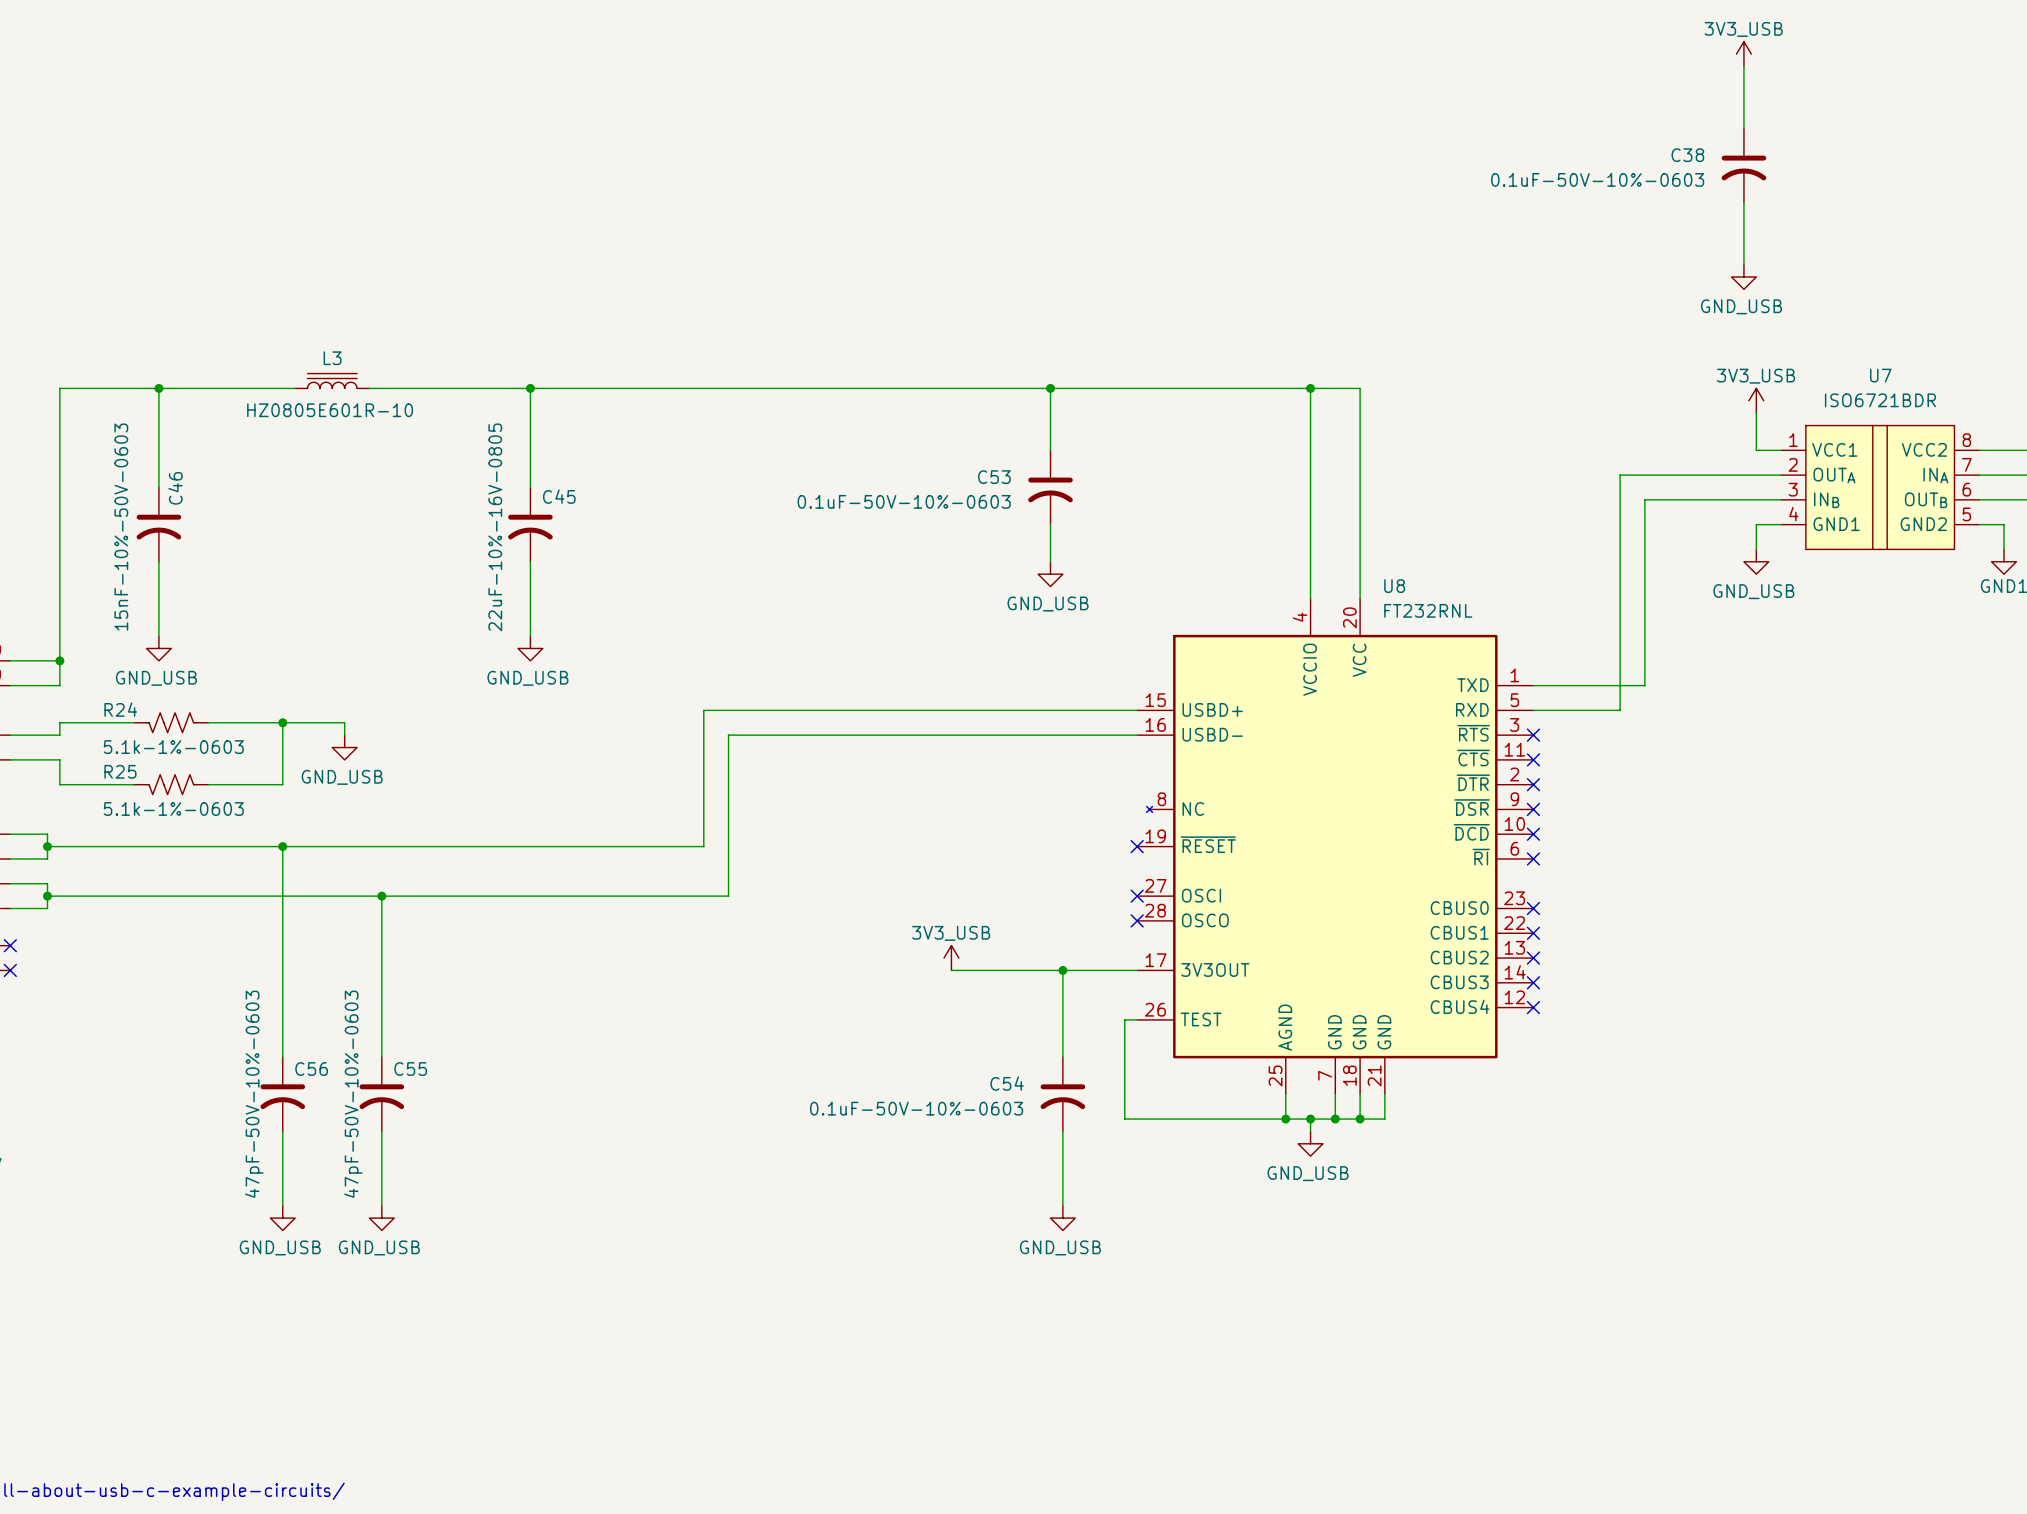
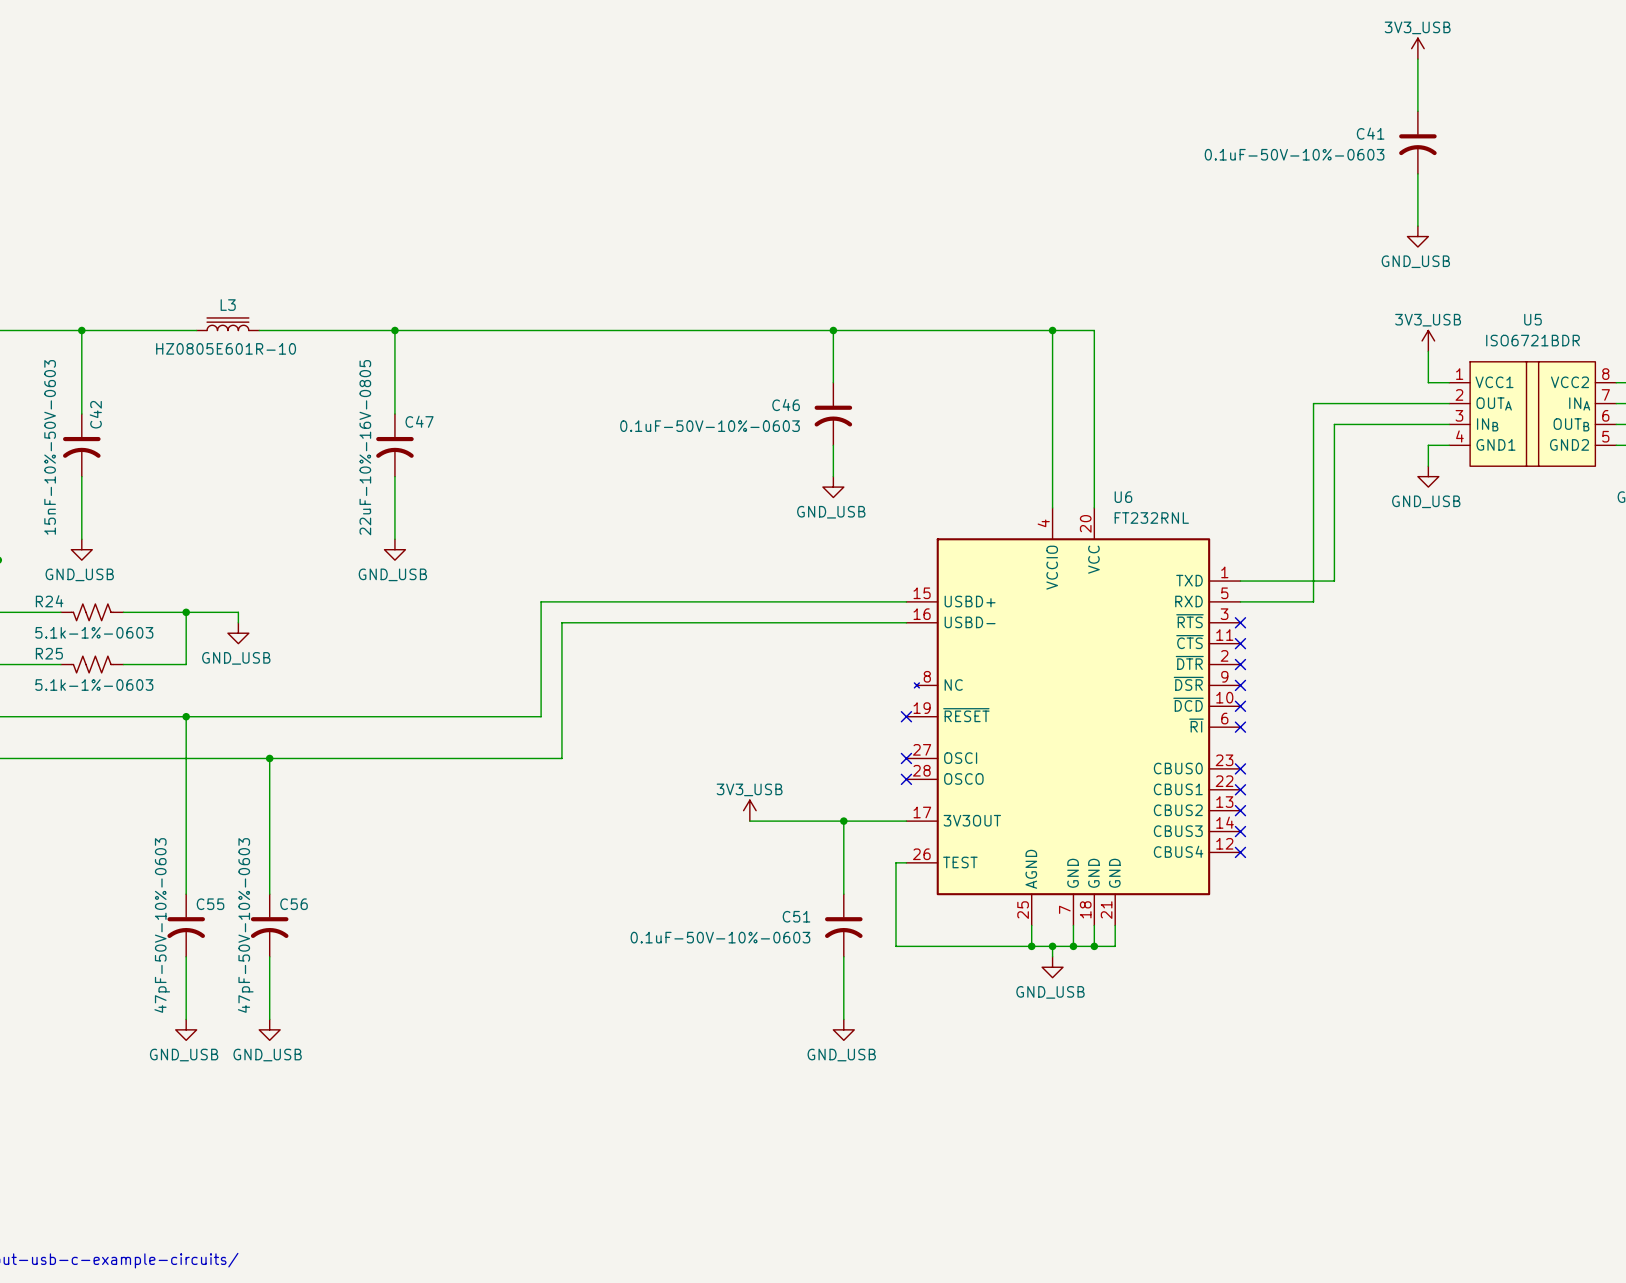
C38 name: C38 (1687, 155) -> C41 (1370, 133)
U7 name: U7 (1880, 375) -> U5 (1532, 319)
C53 name: C53 (994, 477) -> C46 (786, 405)
C46 name: C46 (175, 488) -> C42 (95, 414)
C45 name: C45 (559, 496) -> C47 (419, 421)
U8 name: U8 (1394, 586) -> U6 (1123, 497)
C56 name: C56 (311, 1069) -> C55 (210, 904)
C55 name: C55 (410, 1069) -> C56 (294, 904)
C54 name: C54 (1007, 1083) -> C51 (796, 916)

